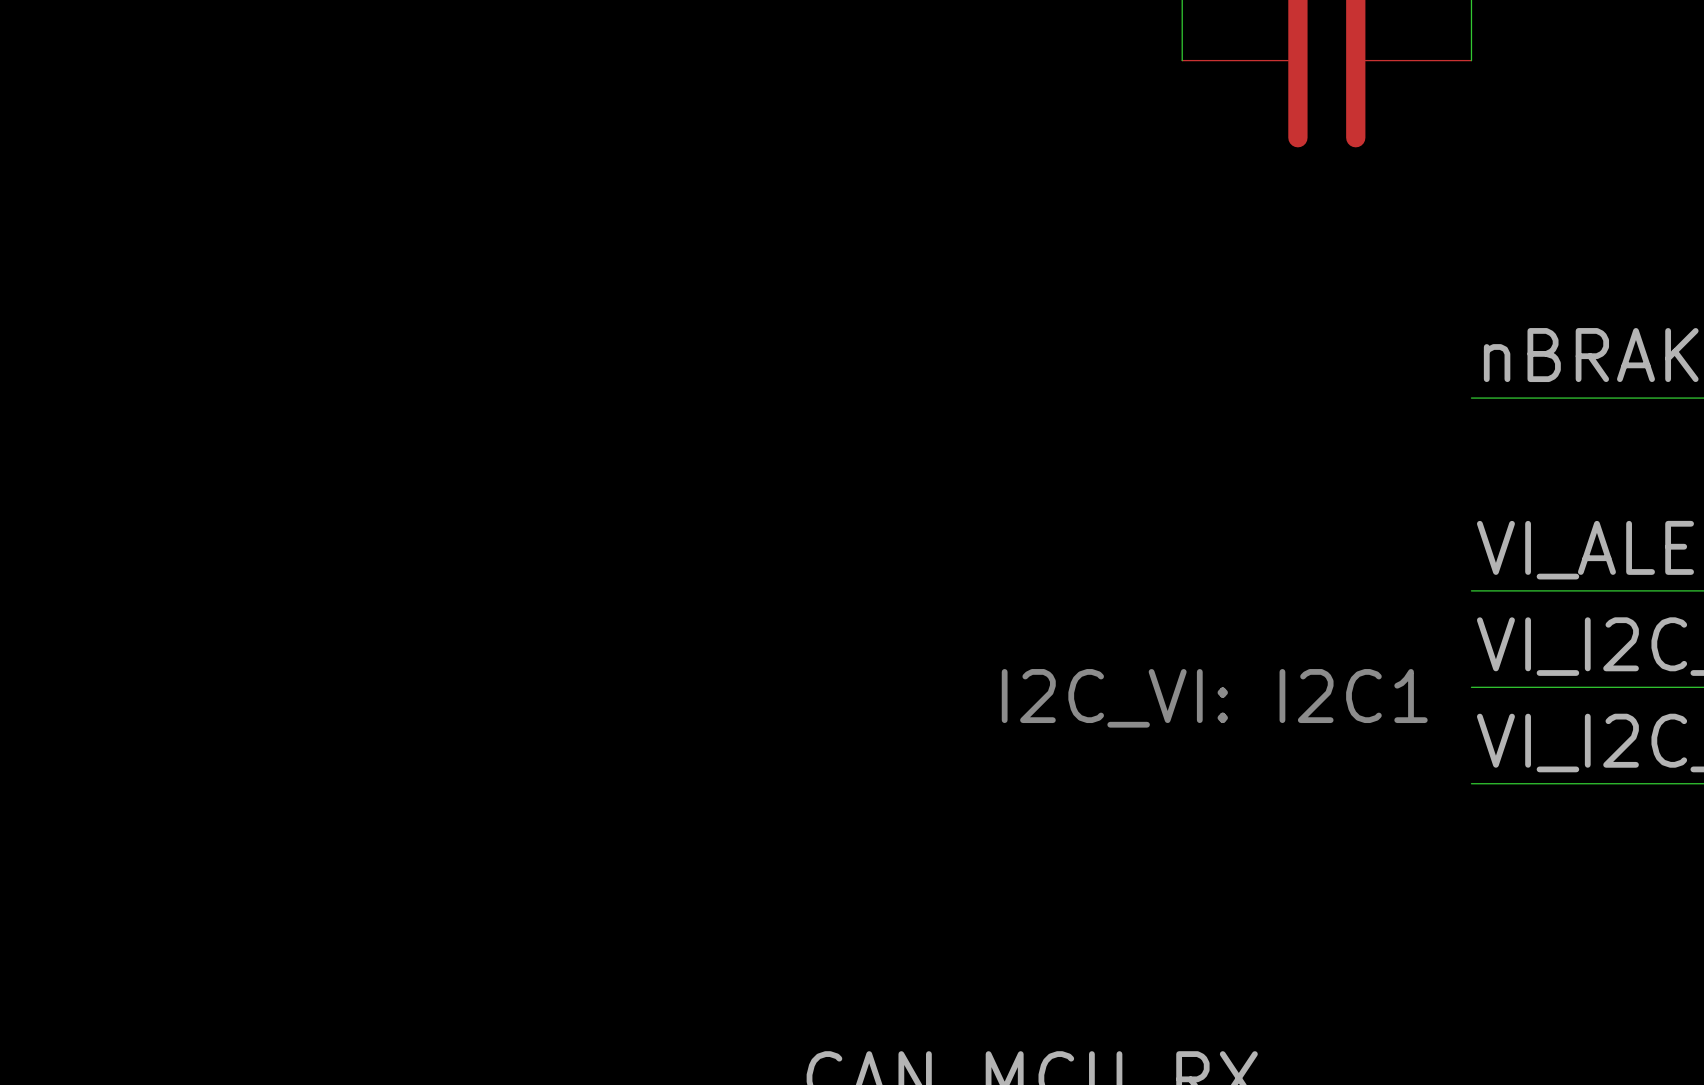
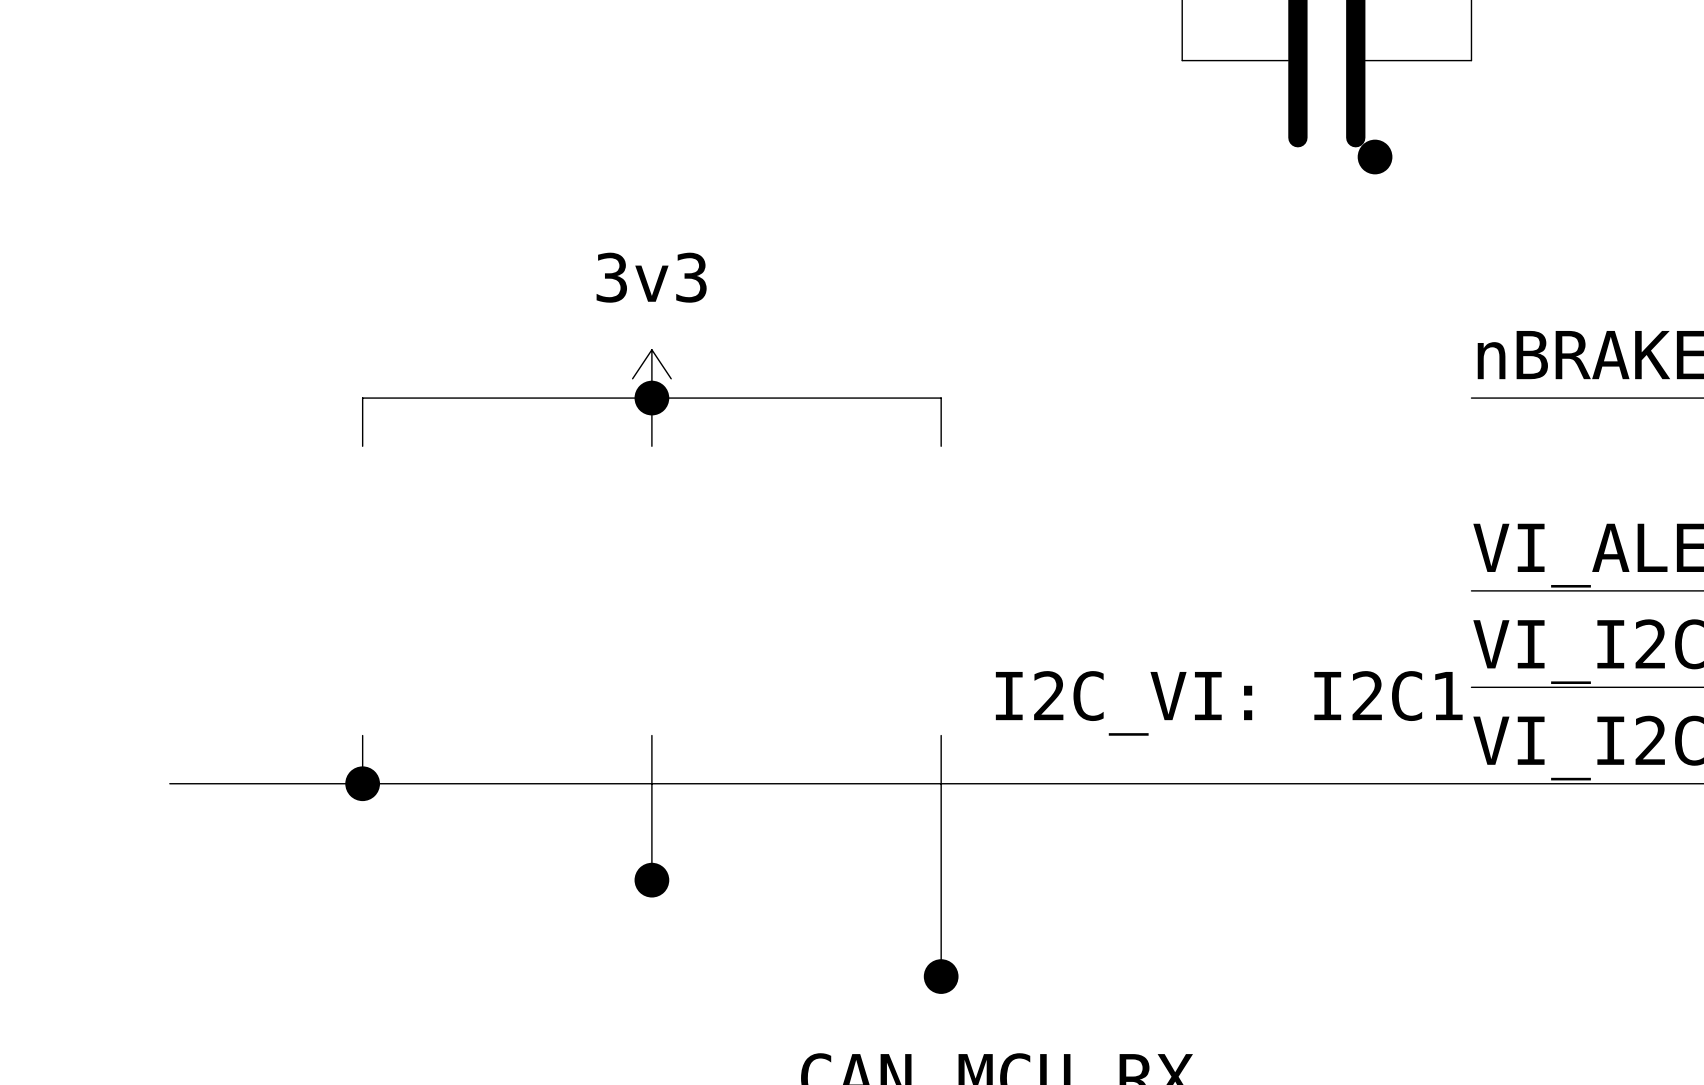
junction: none -> (1375, 157)
power symbol: none -> 3v3 (651, 373)
wire: none -> (651, 398) (651, 446)
junction: none -> (651, 398)
wire: none -> (362, 446) (362, 398) (941, 398) (941, 446)
wire: none -> (362, 735) (362, 783)
wire: none -> (651, 735) (651, 880)
wire: none -> (941, 735) (941, 976)
wire: none -> (169, 783) (1471, 783)
junction: none -> (362, 783)
junction: none -> (651, 880)
junction: none -> (941, 976)

